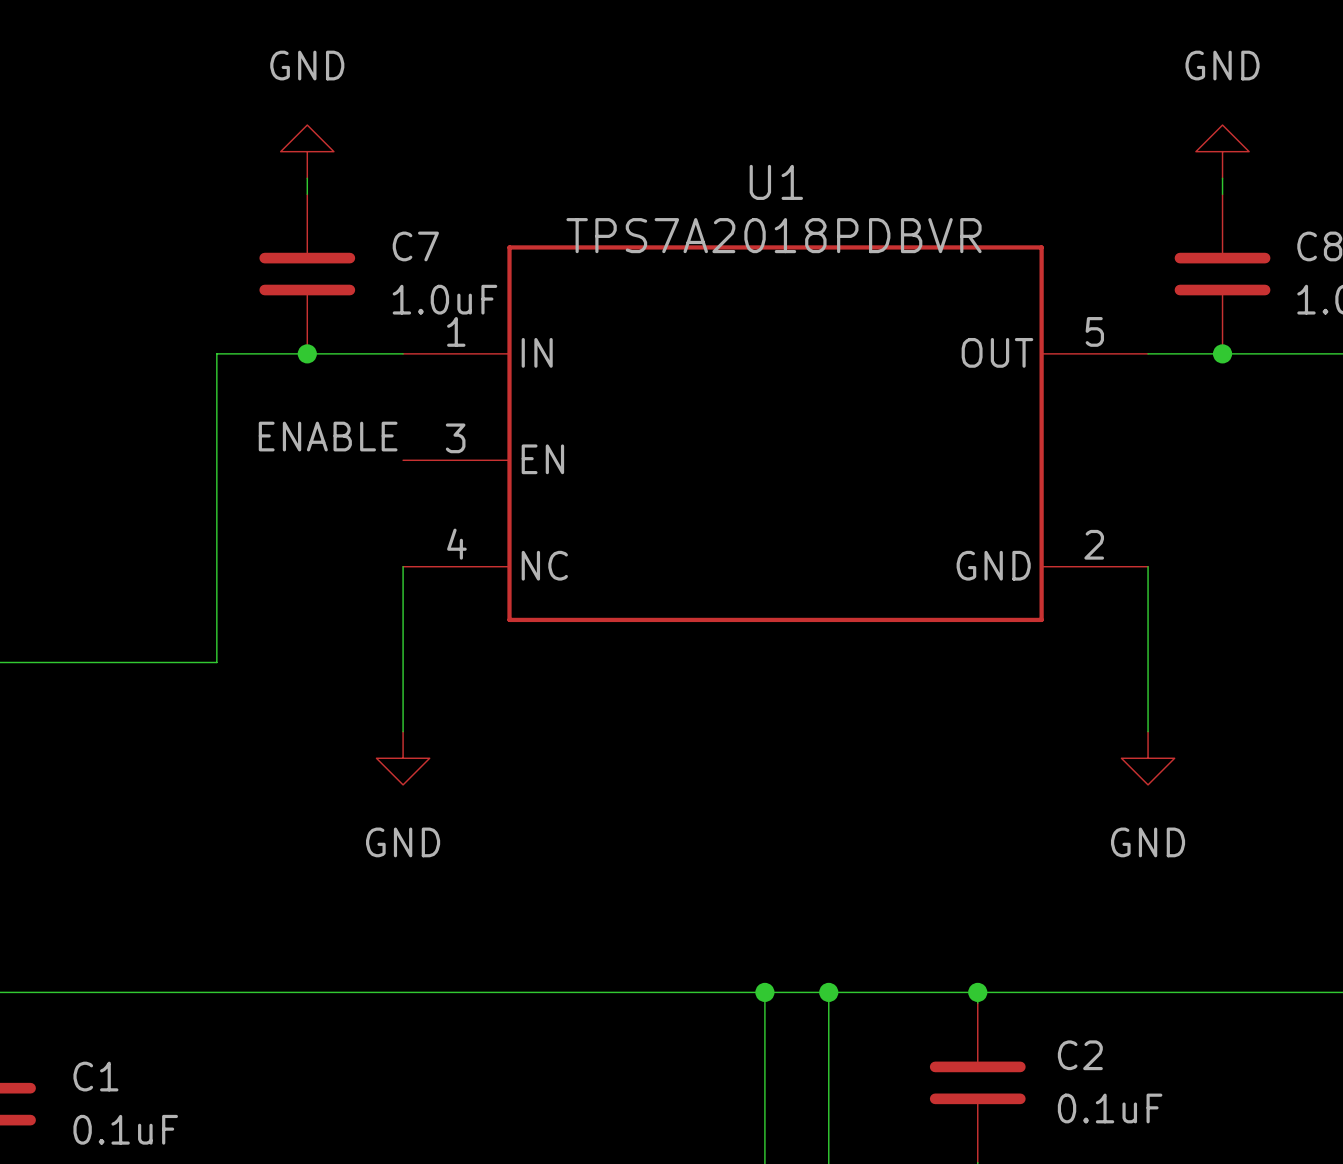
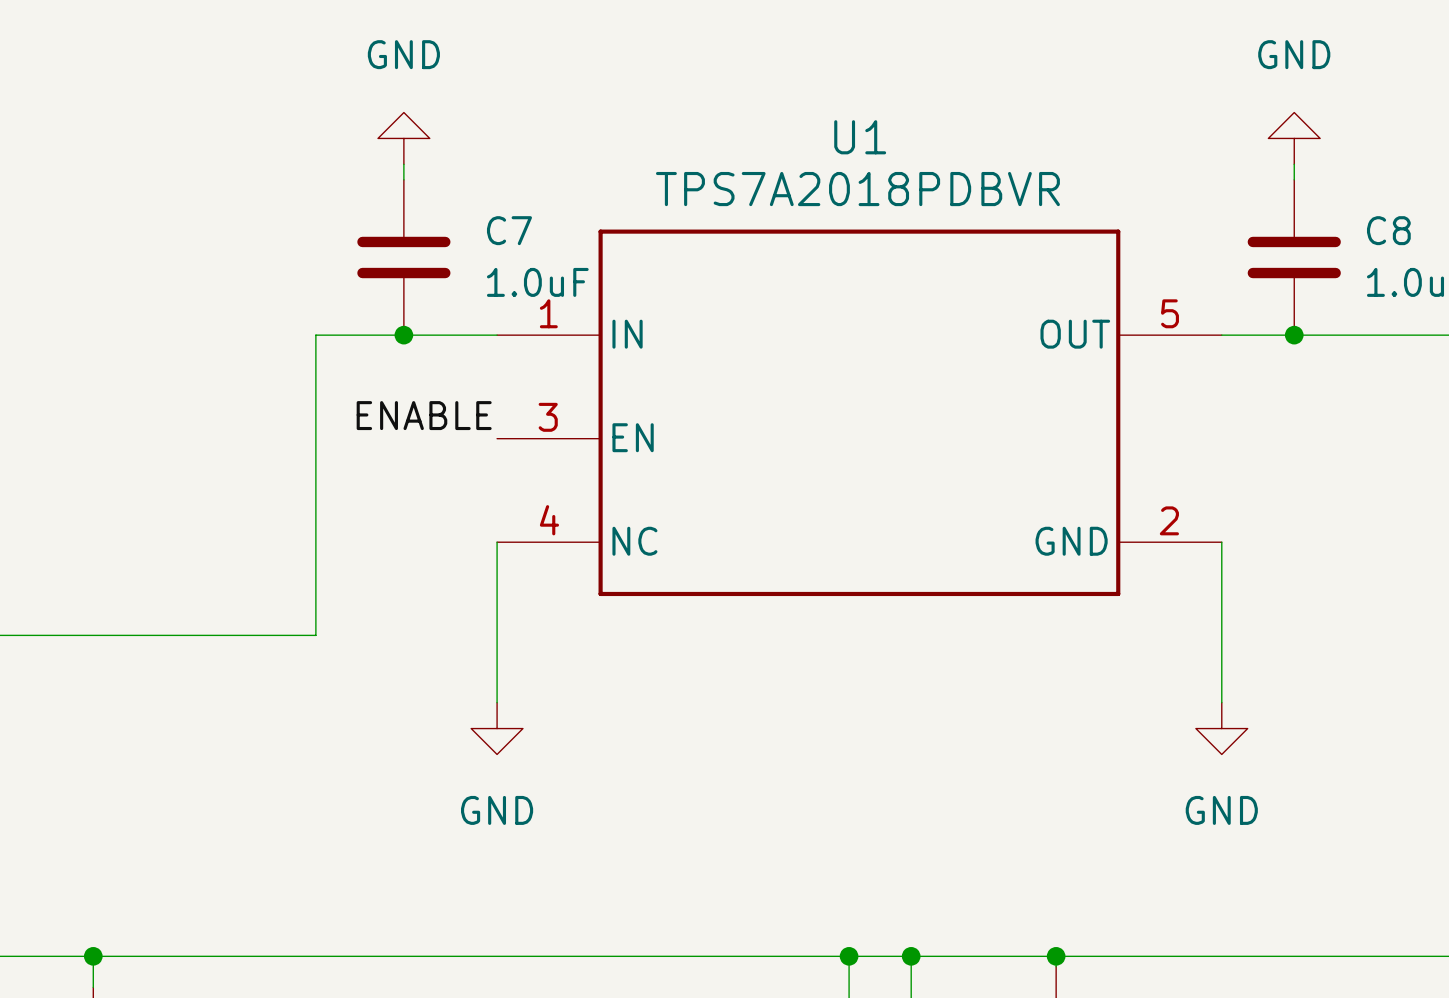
U1 name position: U1 (776, 182) -> U1 (860, 137)
U1 value position: TPS7A2018PDBVR (774, 235) -> TPS7A2018PDBVR (857, 189)

